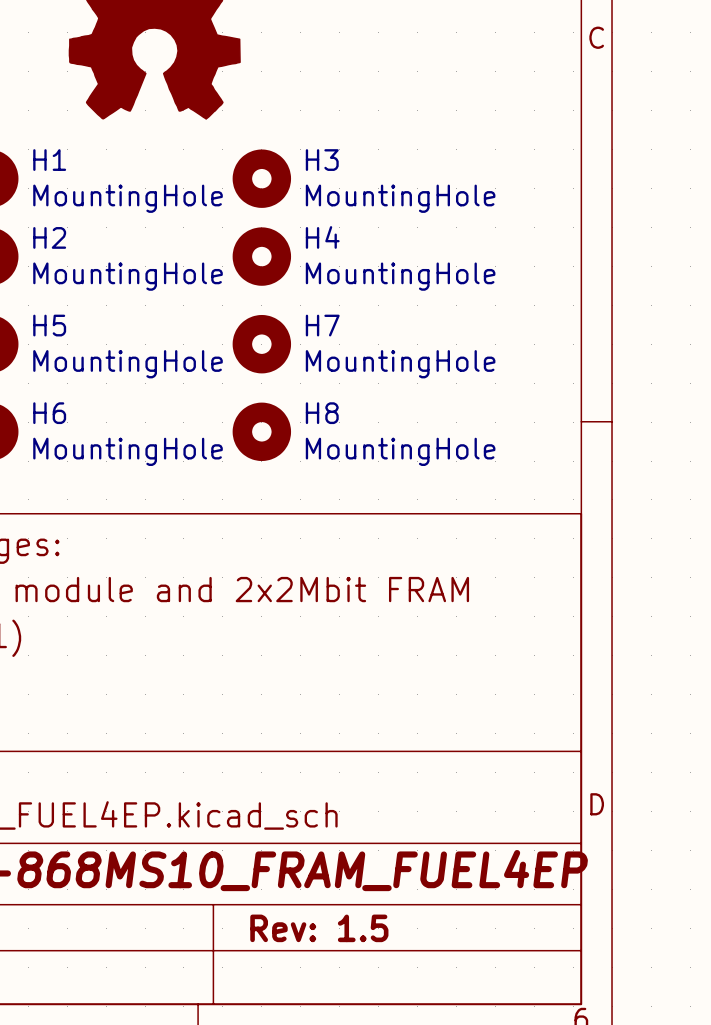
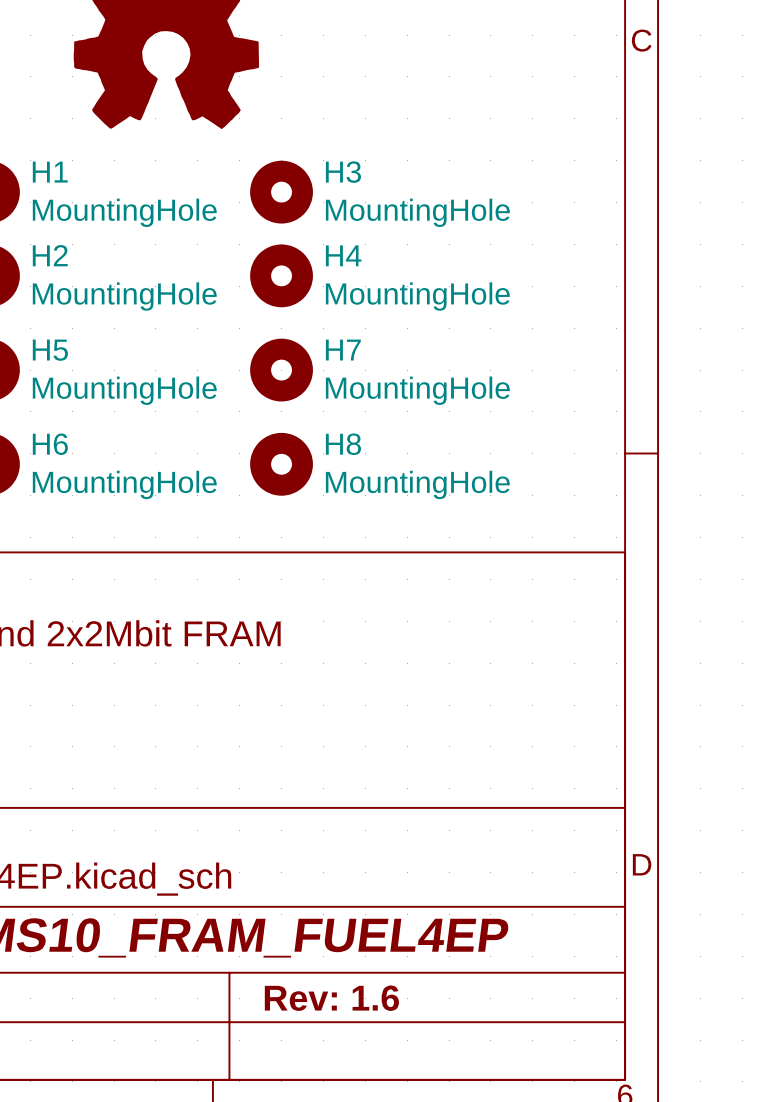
title block: Rev: 1.5 (319, 928) -> Rev: 1.6 (331, 998)

